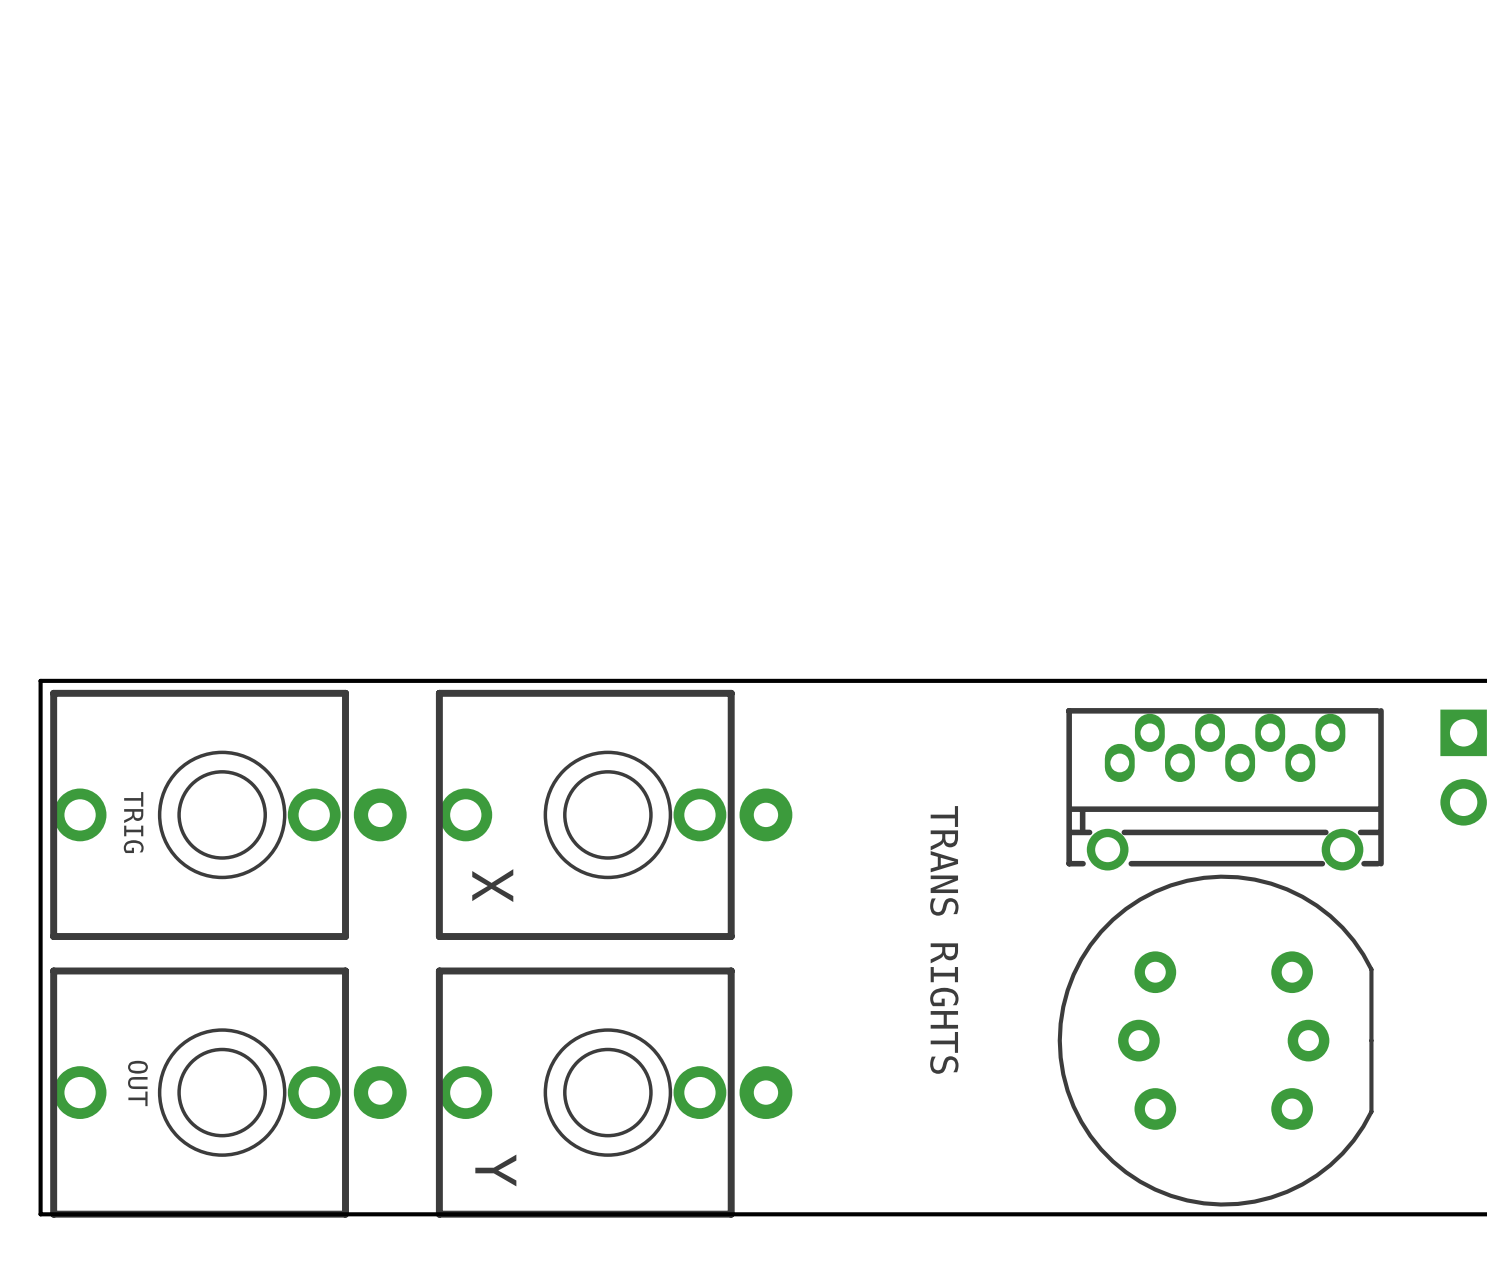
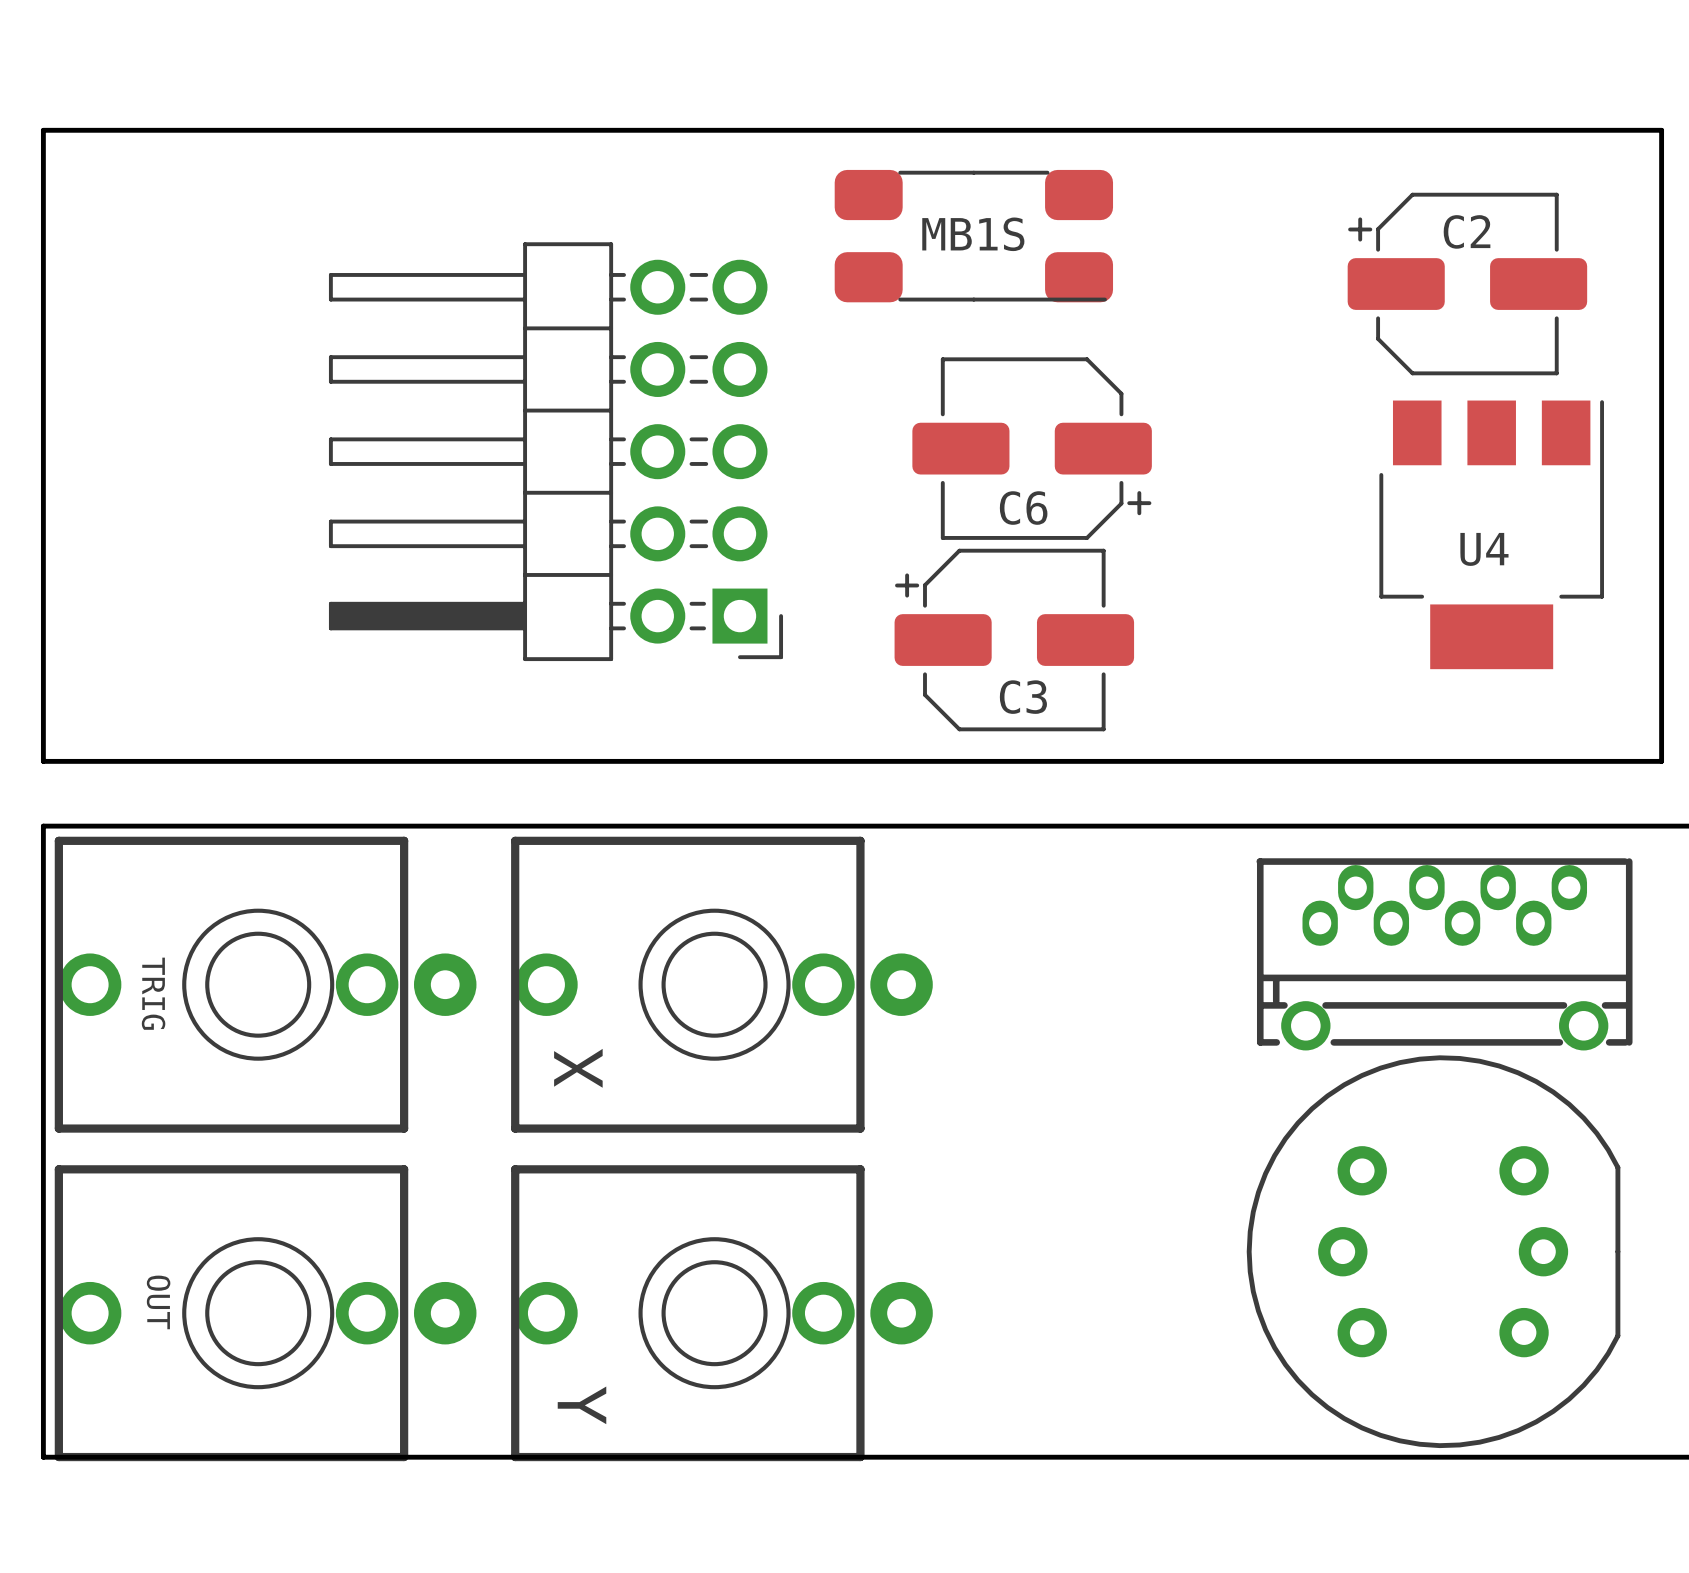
board edge: none -> (43, 130) (1661, 130) (1661, 761) (43, 761) (43, 130)
part: none -> (973, 236)
C2: none -> (1467, 284)
C6: none -> (1032, 448)
part: none -> (555, 451)
U4: none -> (1491, 534)
C3: none -> (1014, 640)
text: TRANS RIGHTS (944, 939) -> none

